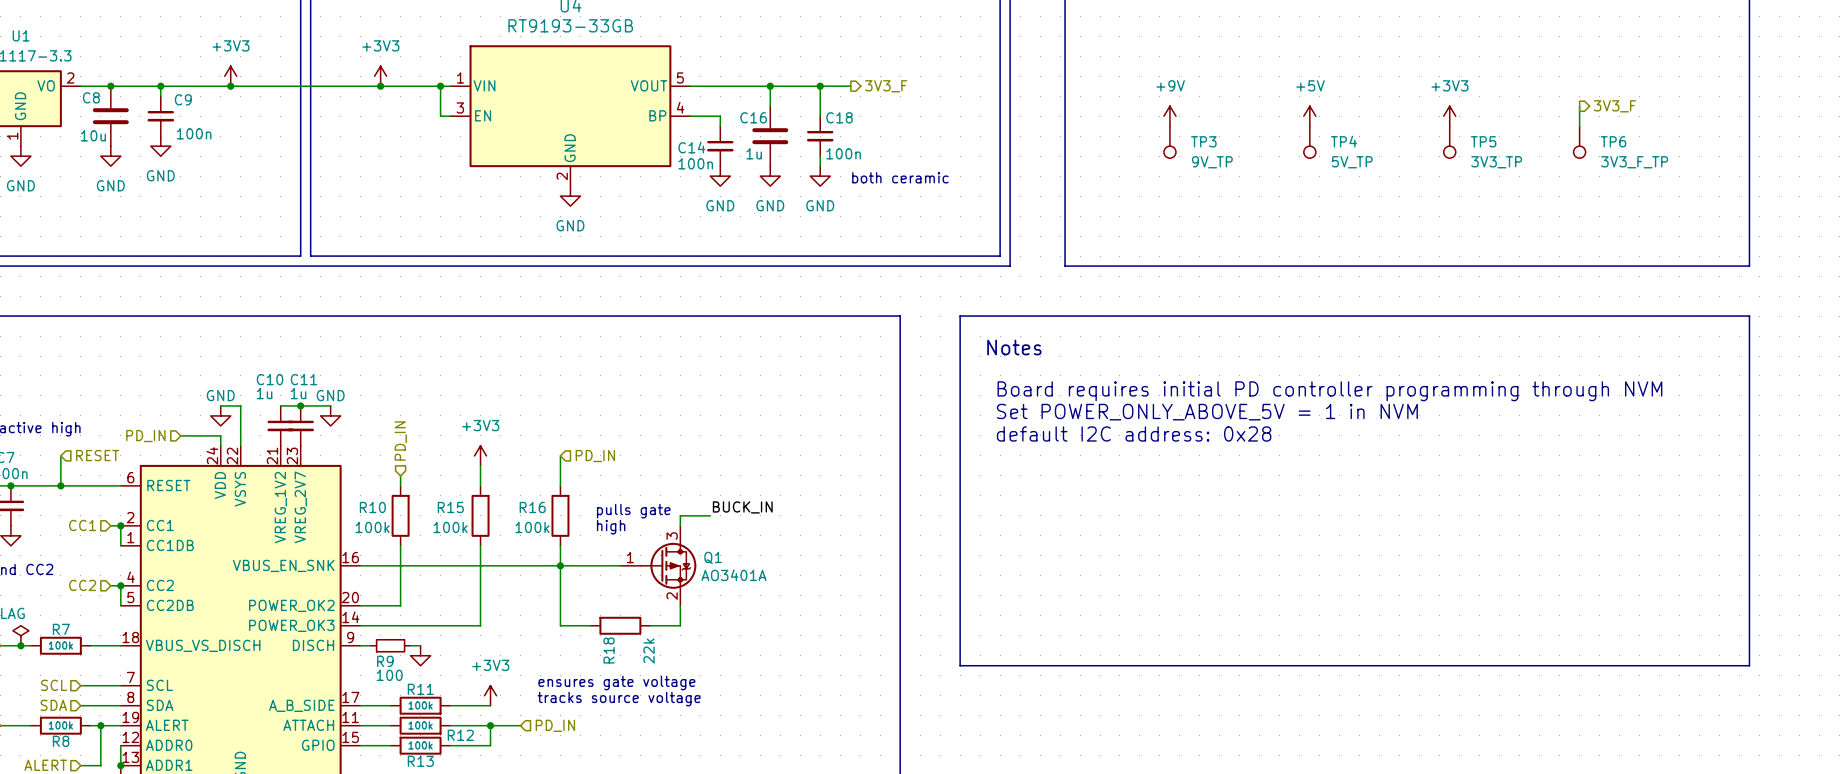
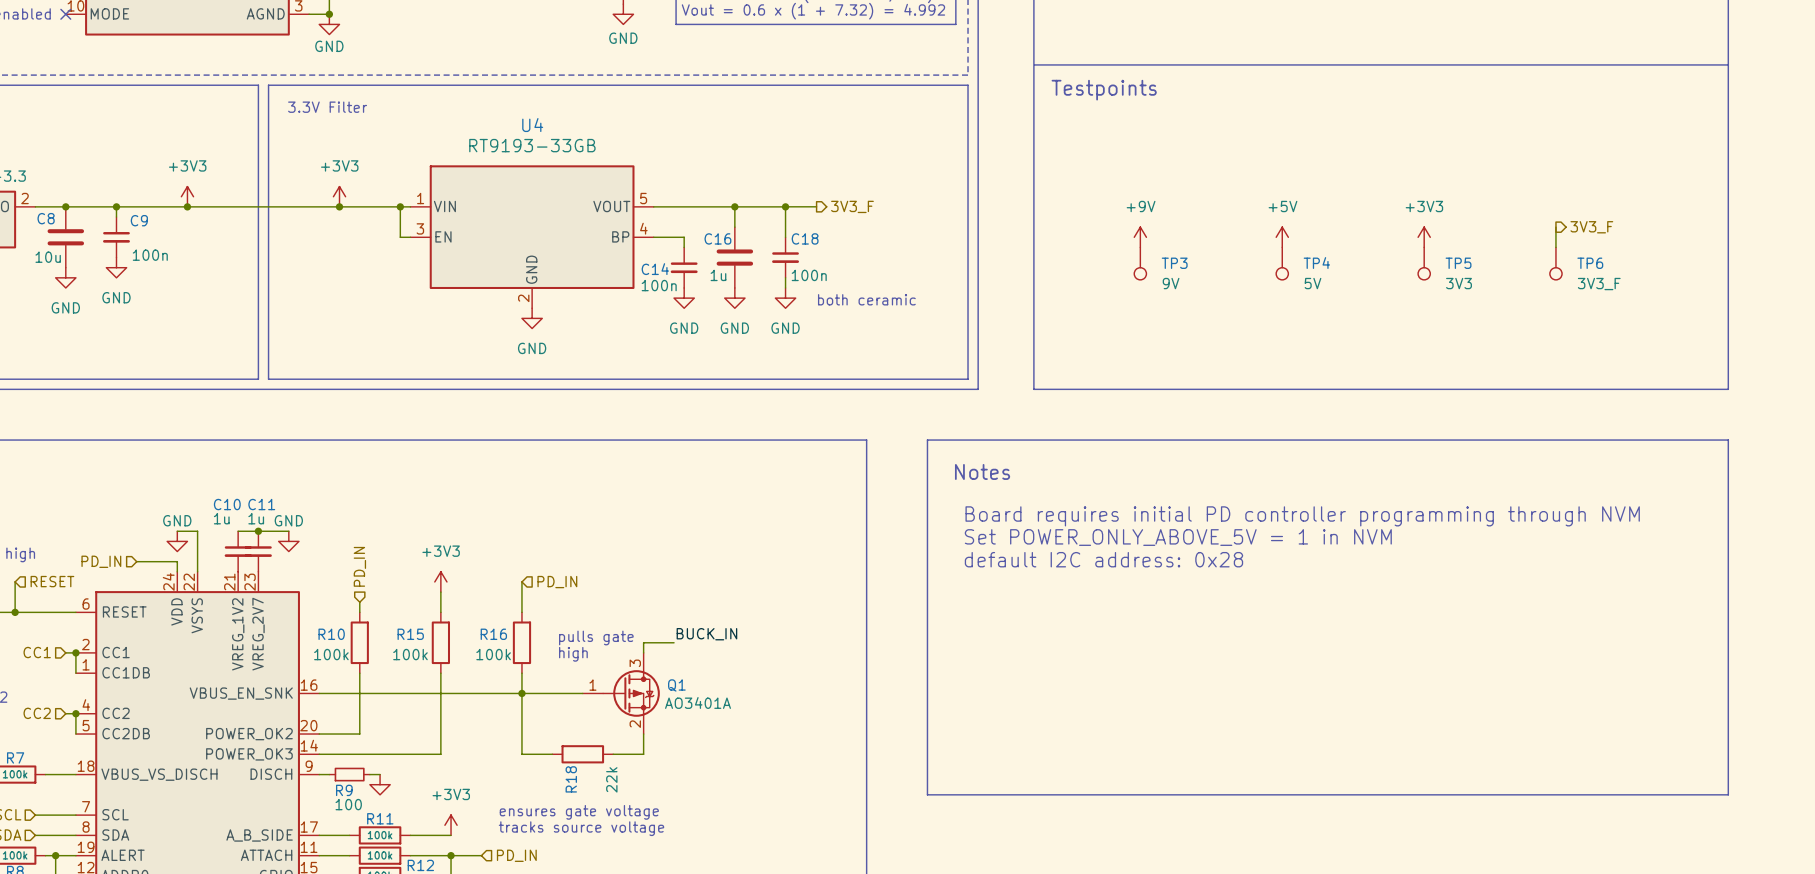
TP3 value: 9V_TP (1212, 162) -> 9V (1171, 283)
TP4 value: 5V_TP (1352, 162) -> 5V (1312, 283)
TP5 value: 3V3_TP (1496, 162) -> 3V3 (1459, 283)
TP6 value: 3V3_F_TP (1634, 162) -> 3V3_F (1599, 284)

